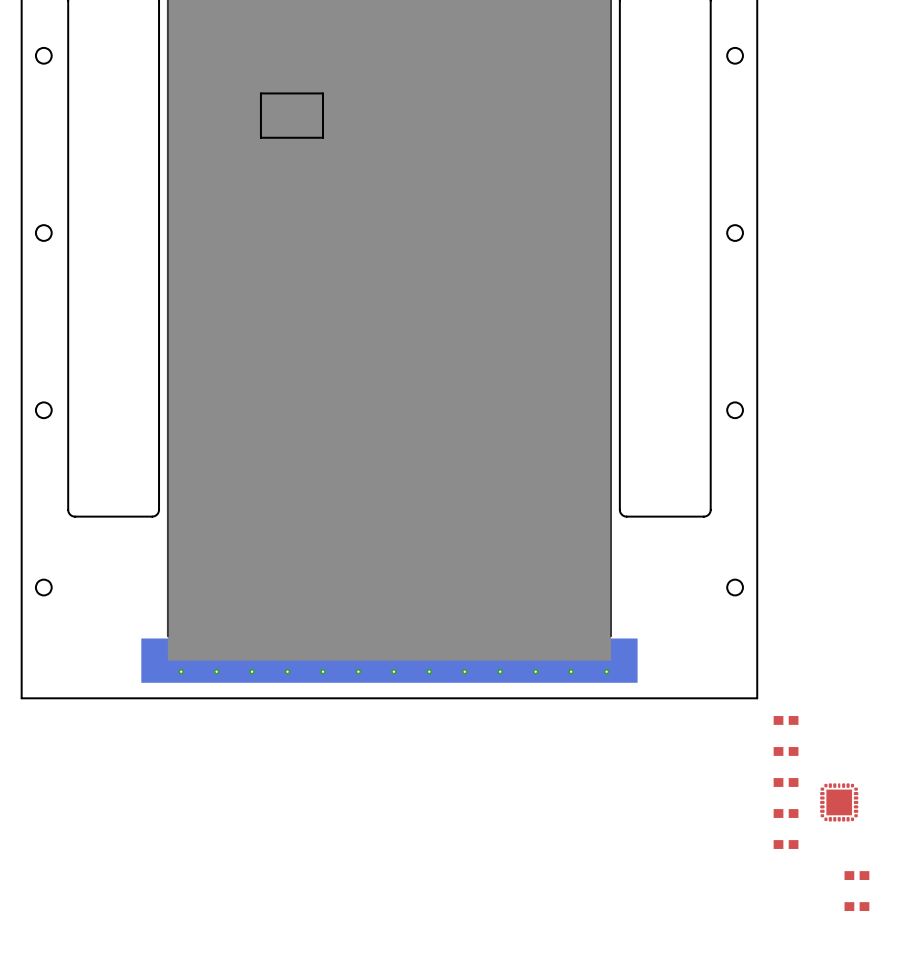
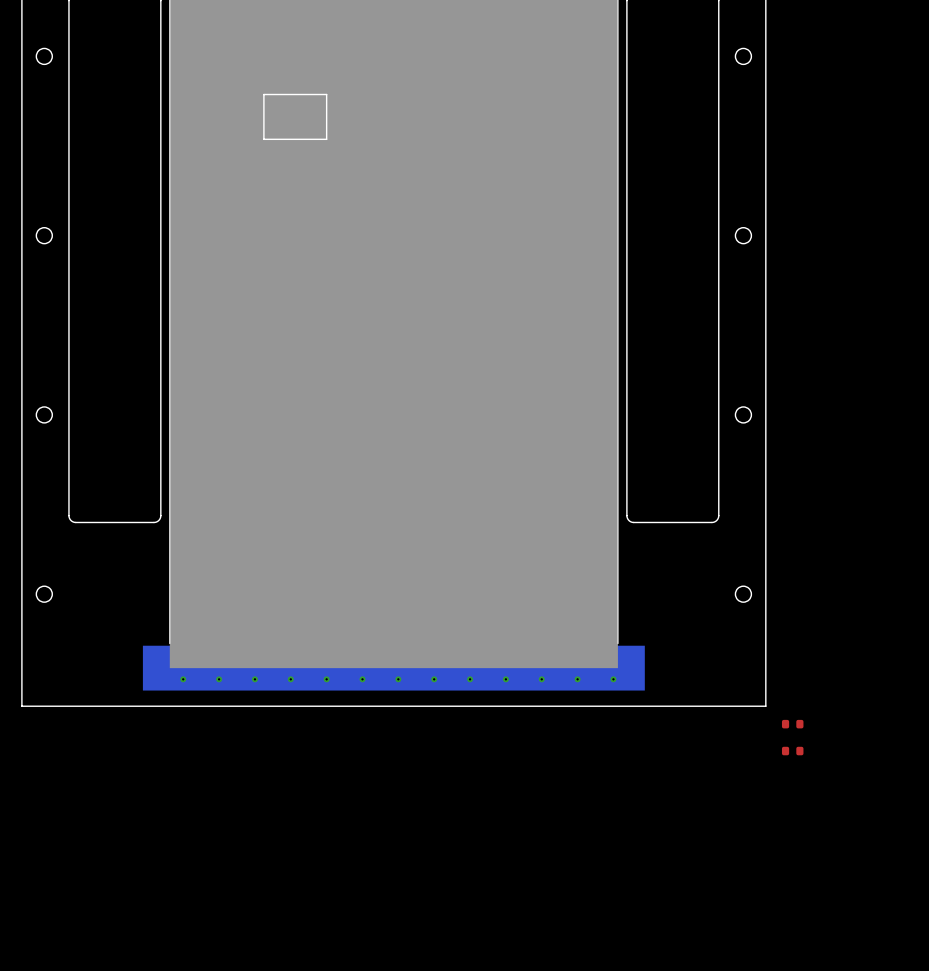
part footprint: [773, 716, 799, 725] -> [781, 719, 804, 729]
part: none -> (792, 751)
part: (786, 751) -> none
part: (786, 782) -> none
part: (839, 802) -> none
part: (786, 813) -> none
part: (786, 844) -> none
part: (856, 875) -> none
part: (856, 906) -> none

